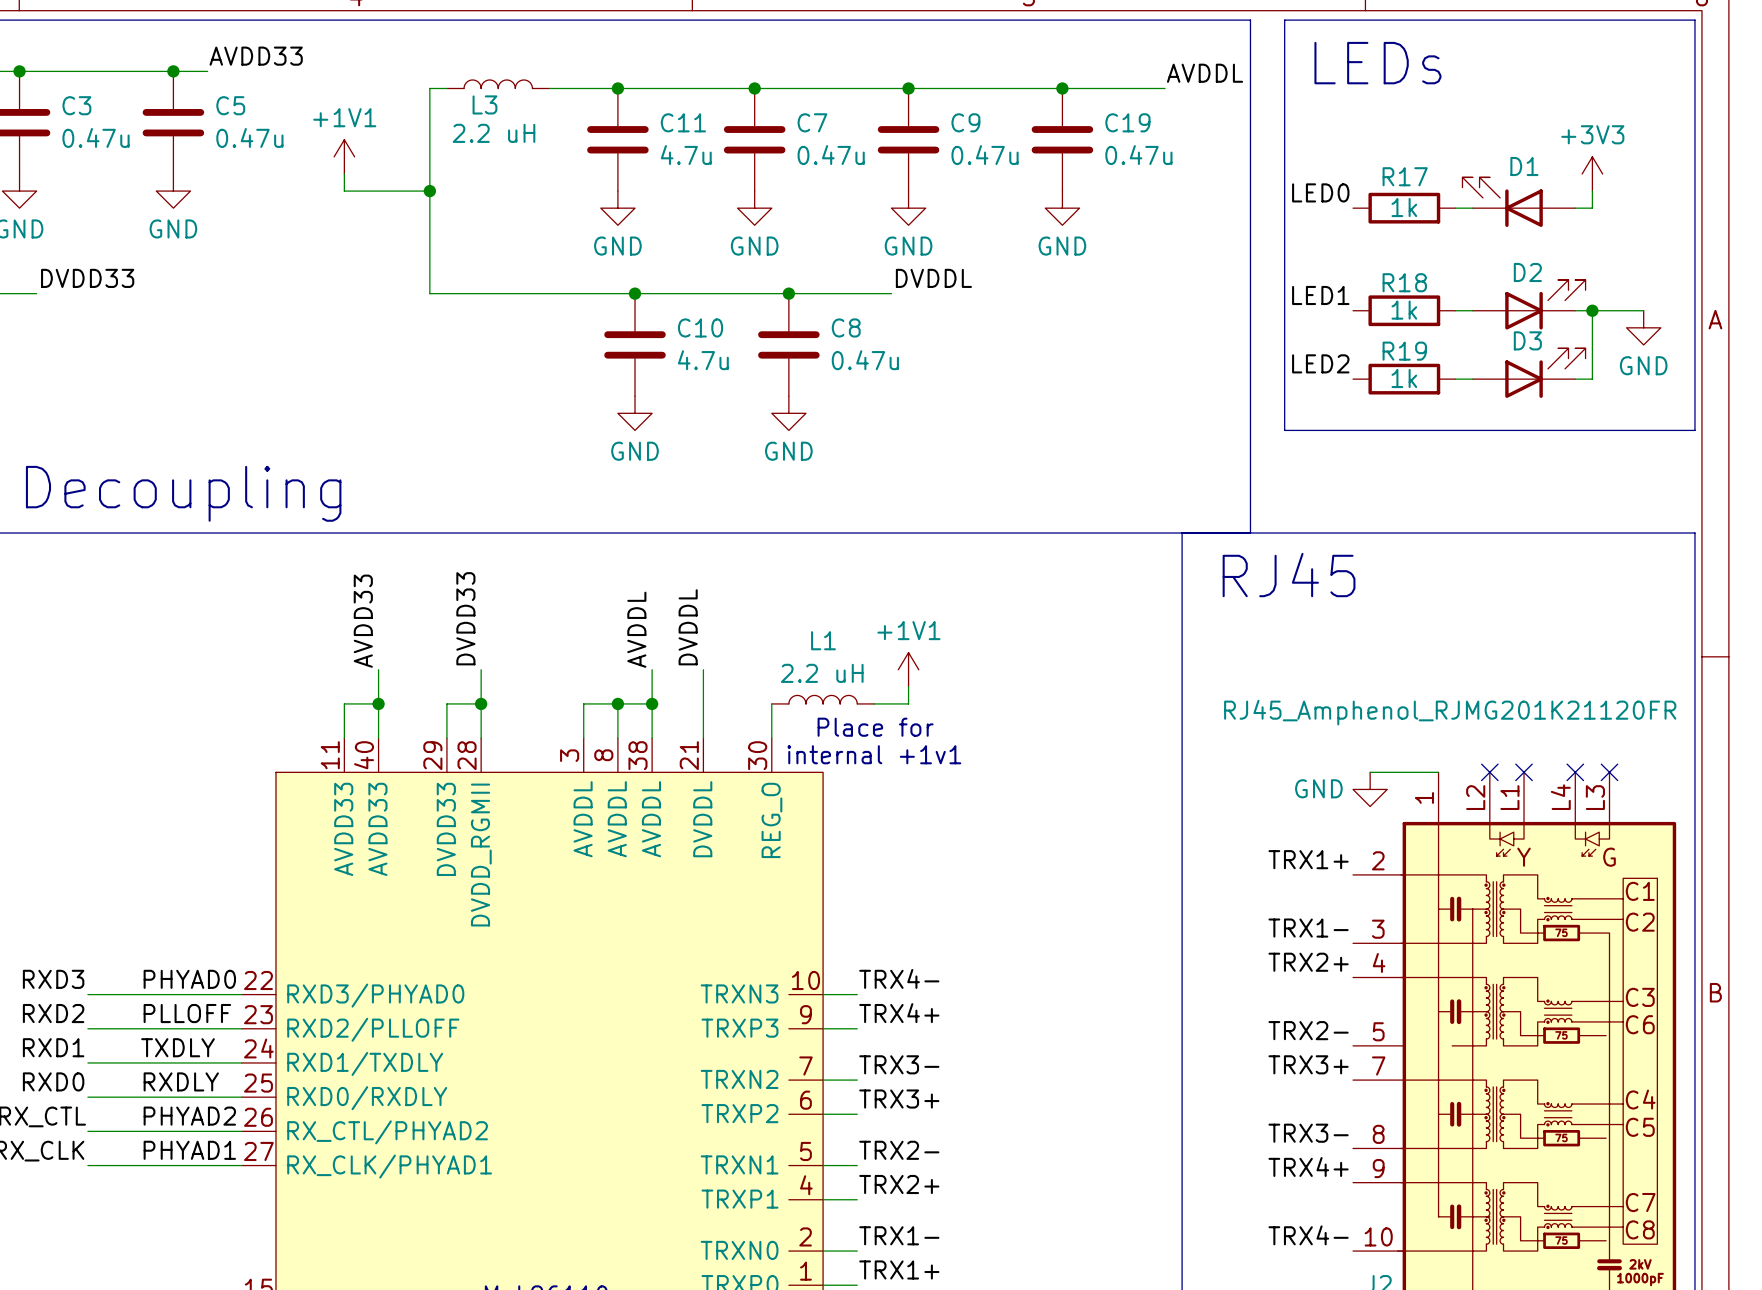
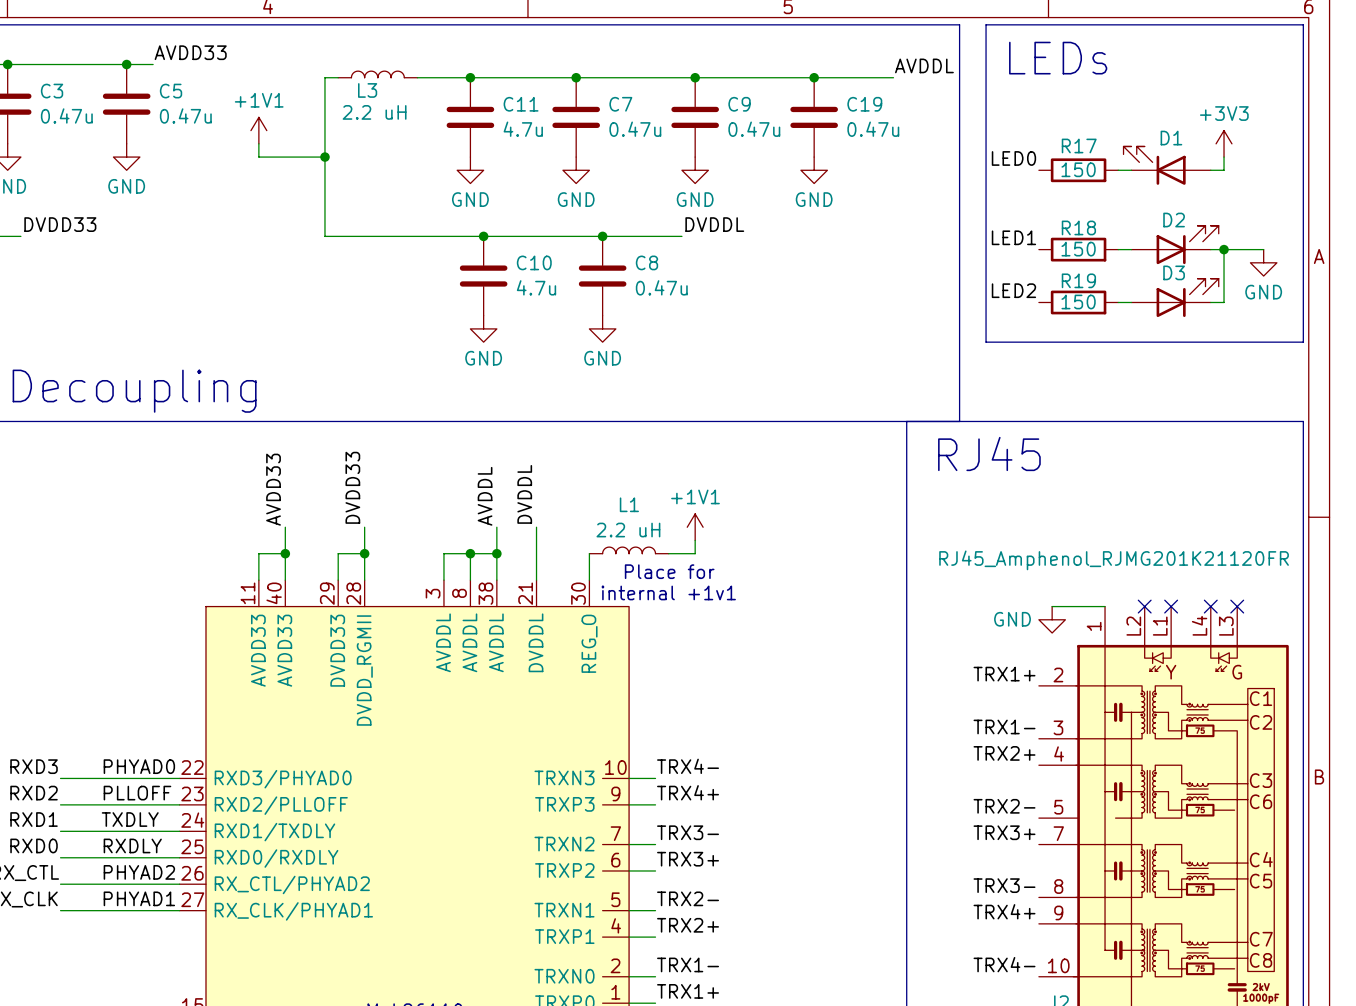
R17 value: 1k (1404, 207) -> 150 (1078, 169)
R18 value: 1k (1404, 310) -> 150 (1078, 249)
R19 value: 1k (1404, 378) -> 150 (1078, 301)

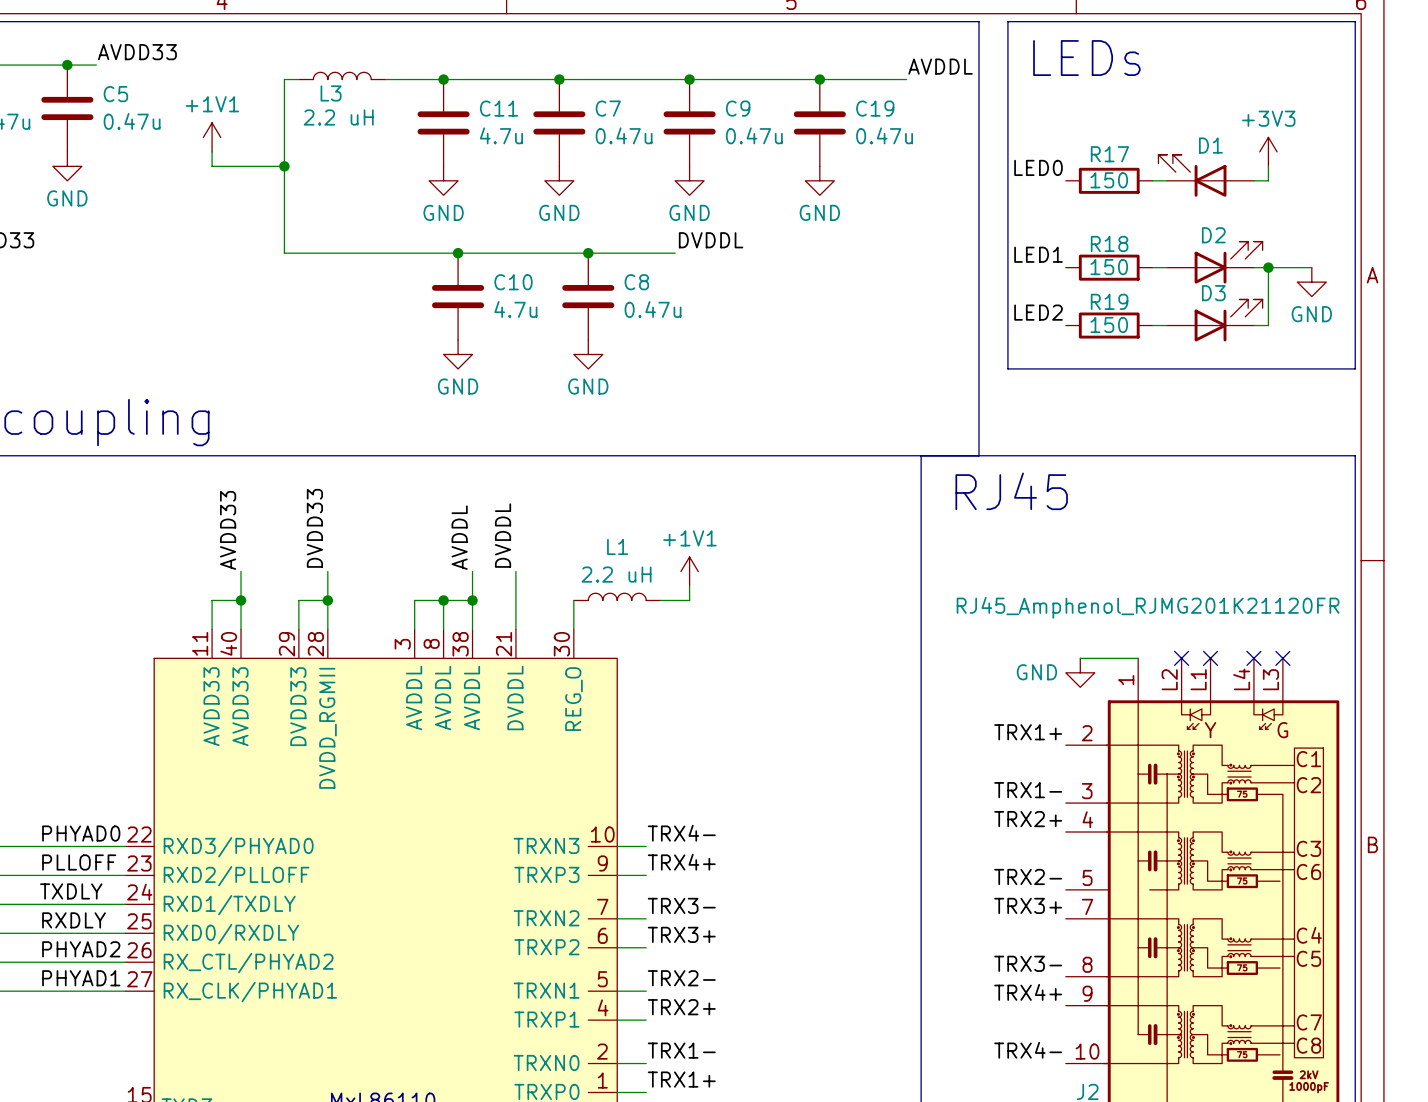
text: Place for (669, 571) -> none
text: internal +1v1 (668, 592) -> none

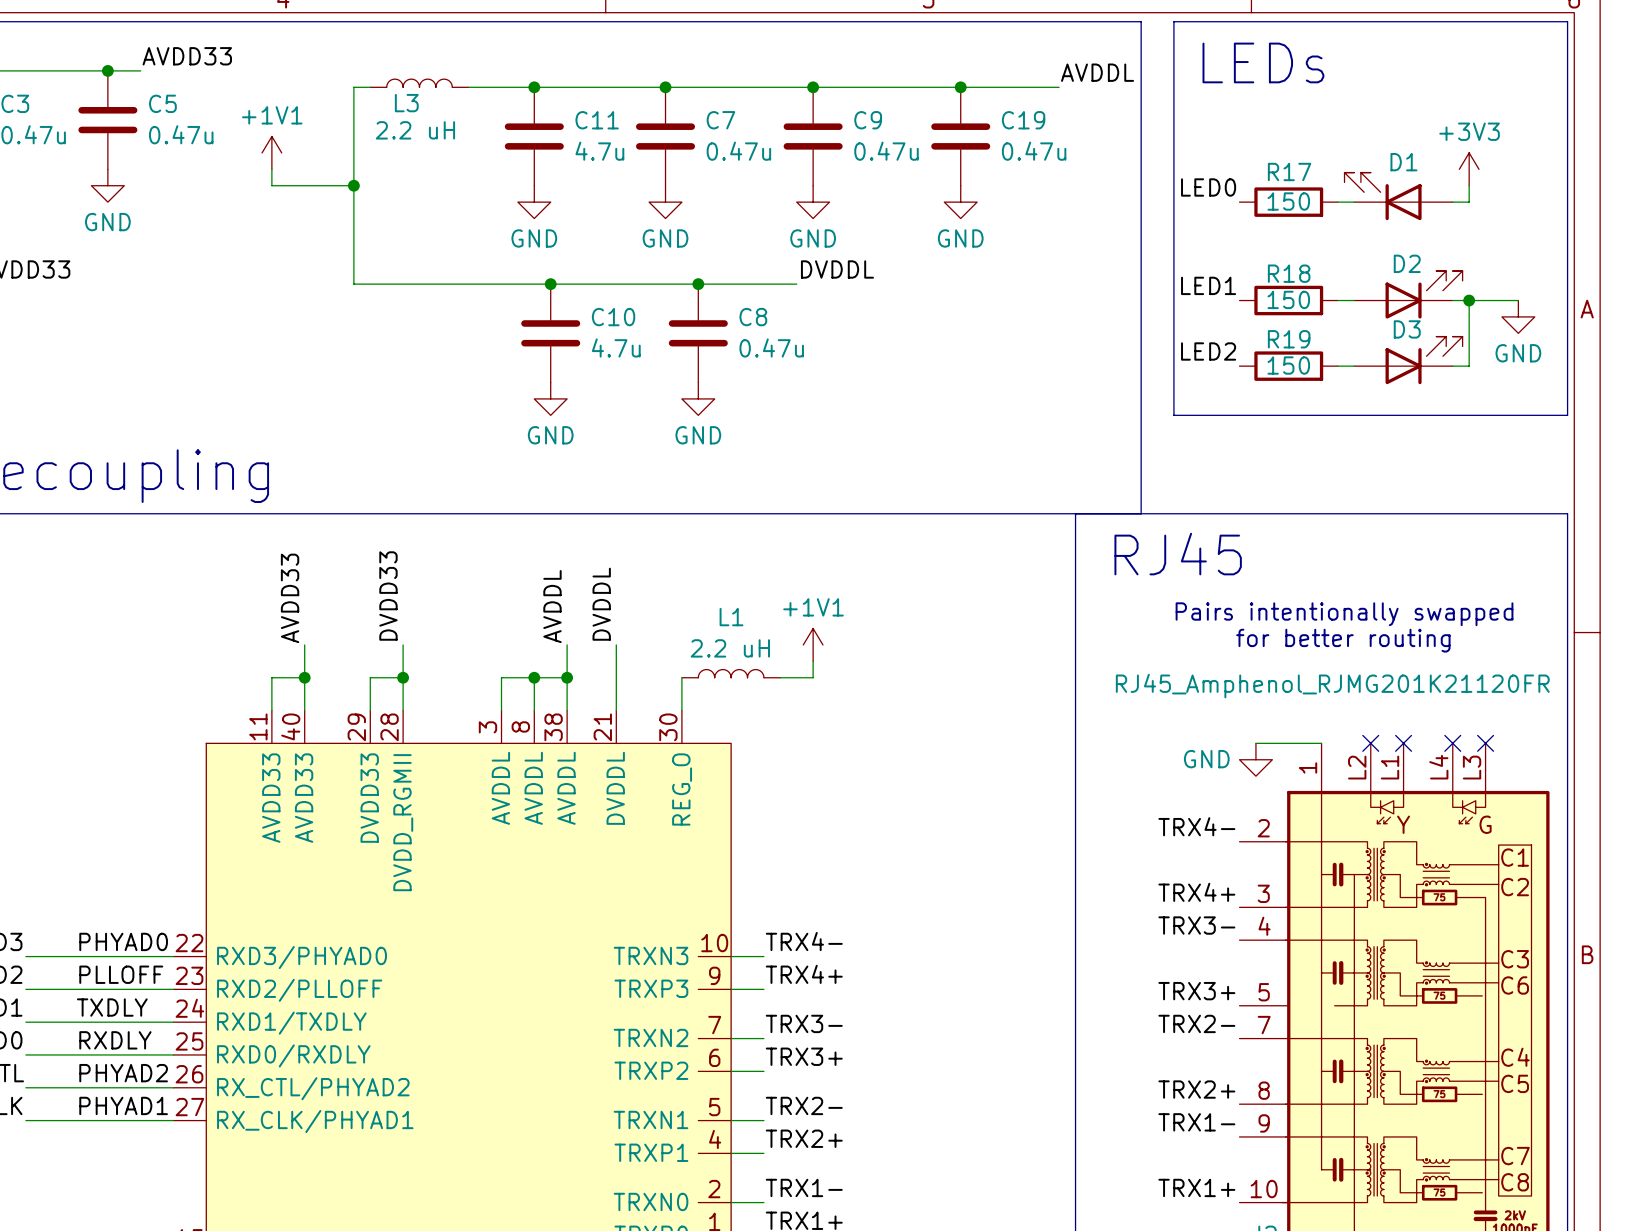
text: none -> Pairs intentionally swapped (1344, 614)
text: none -> for better routing (1343, 640)
label: TRX1+ (1028, 732) -> TRX4- (1196, 826)
label: TRX1- (1028, 790) -> TRX4+ (1196, 892)
label: TRX2+ (1028, 819) -> TRX3- (1196, 925)
label: TRX2- (1028, 876) -> TRX3+ (1196, 991)
label: TRX3+ (1028, 905) -> TRX2- (1196, 1023)
label: TRX3- (1028, 963) -> TRX2+ (1196, 1089)
label: TRX4+ (1028, 992) -> TRX1- (1196, 1122)
label: TRX4- (1028, 1050) -> TRX1+ (1196, 1187)

